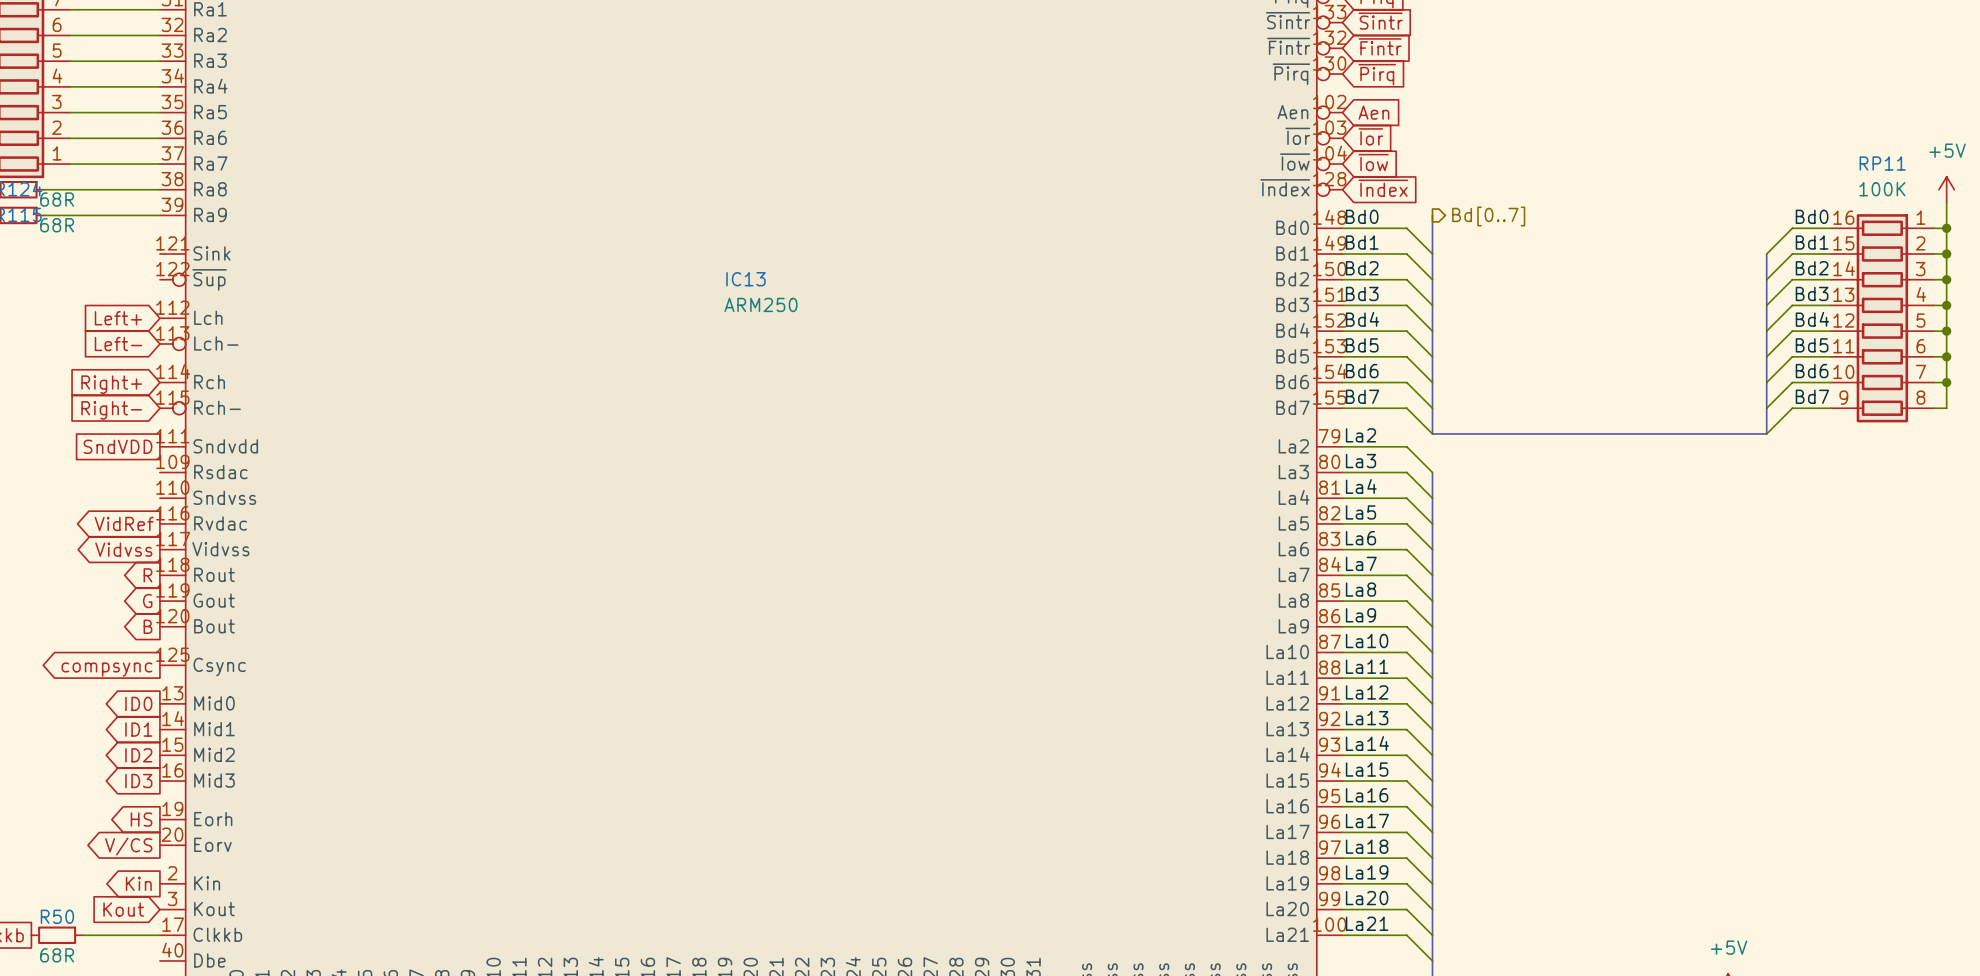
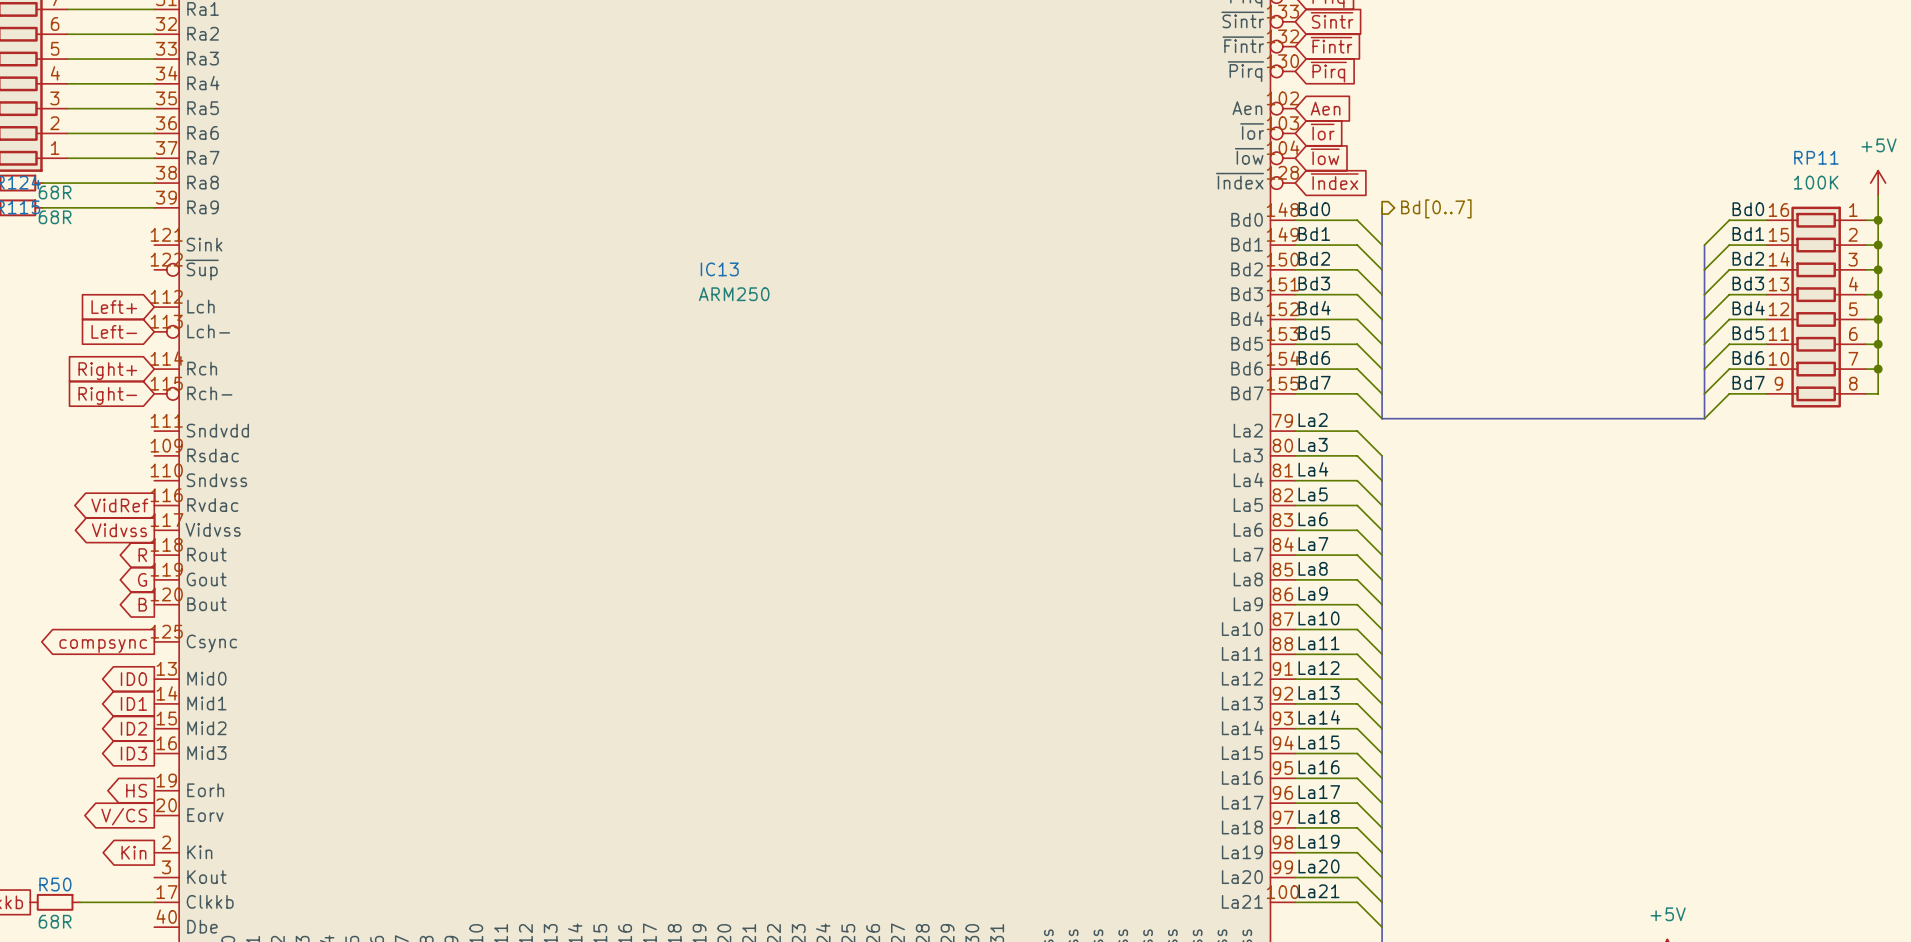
global label: SndVDD (118, 446) -> none
global label: Kout (123, 909) -> none

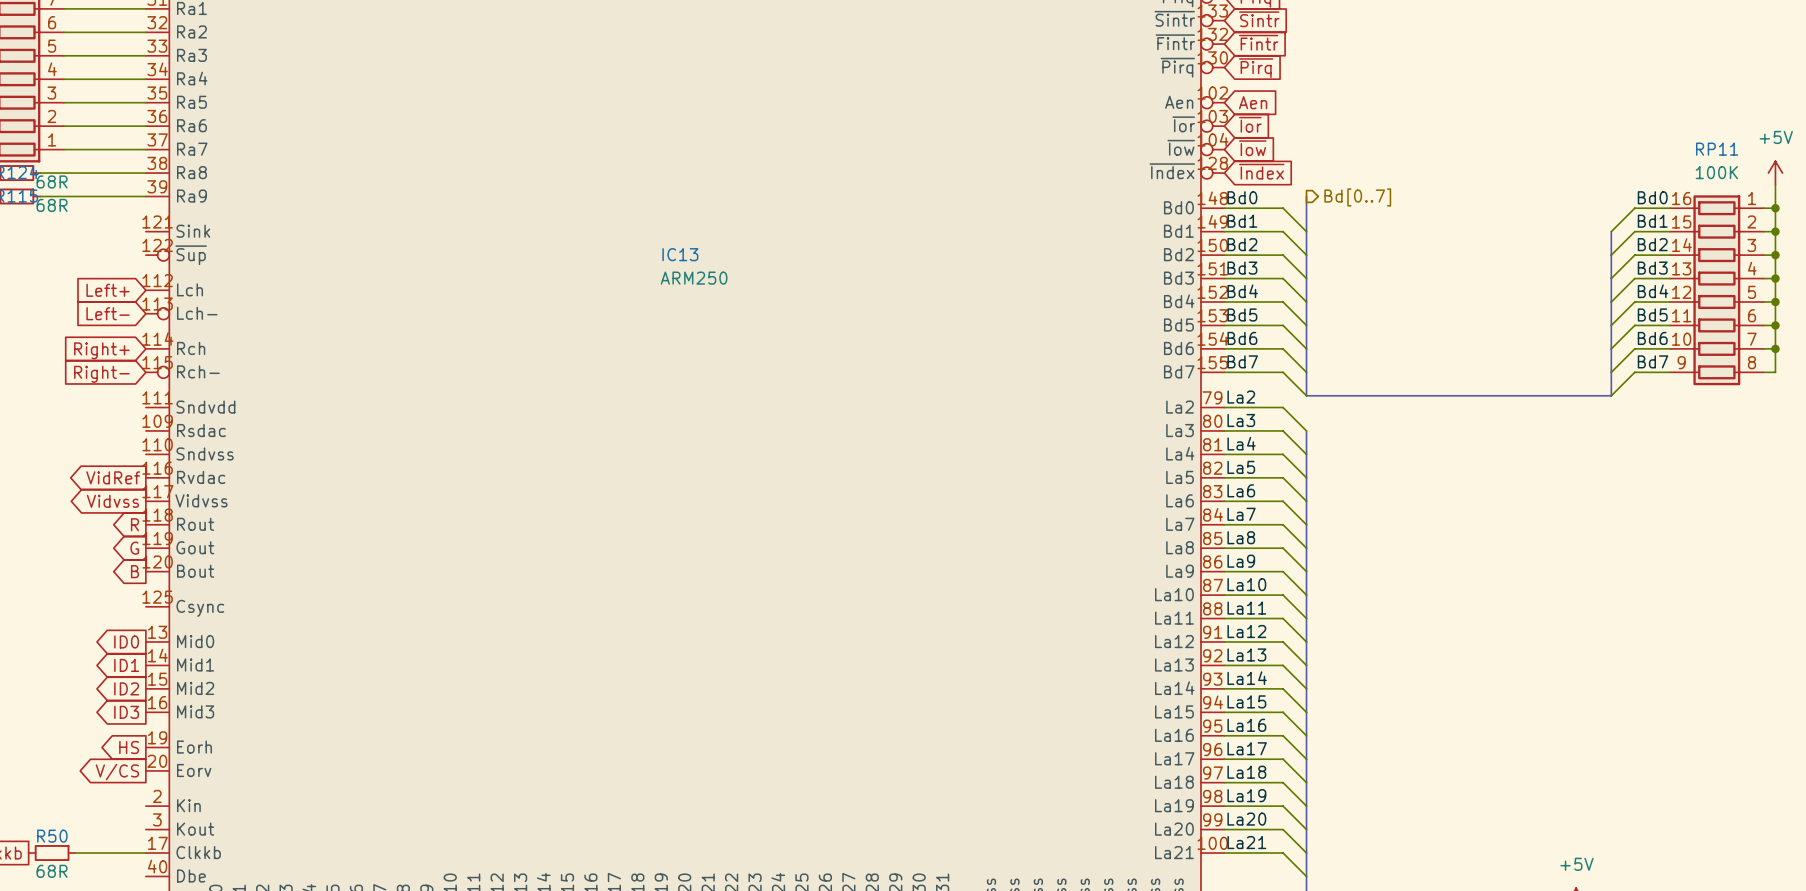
global label: compsync (103, 646) -> none
global label: Kin (133, 852) -> none

